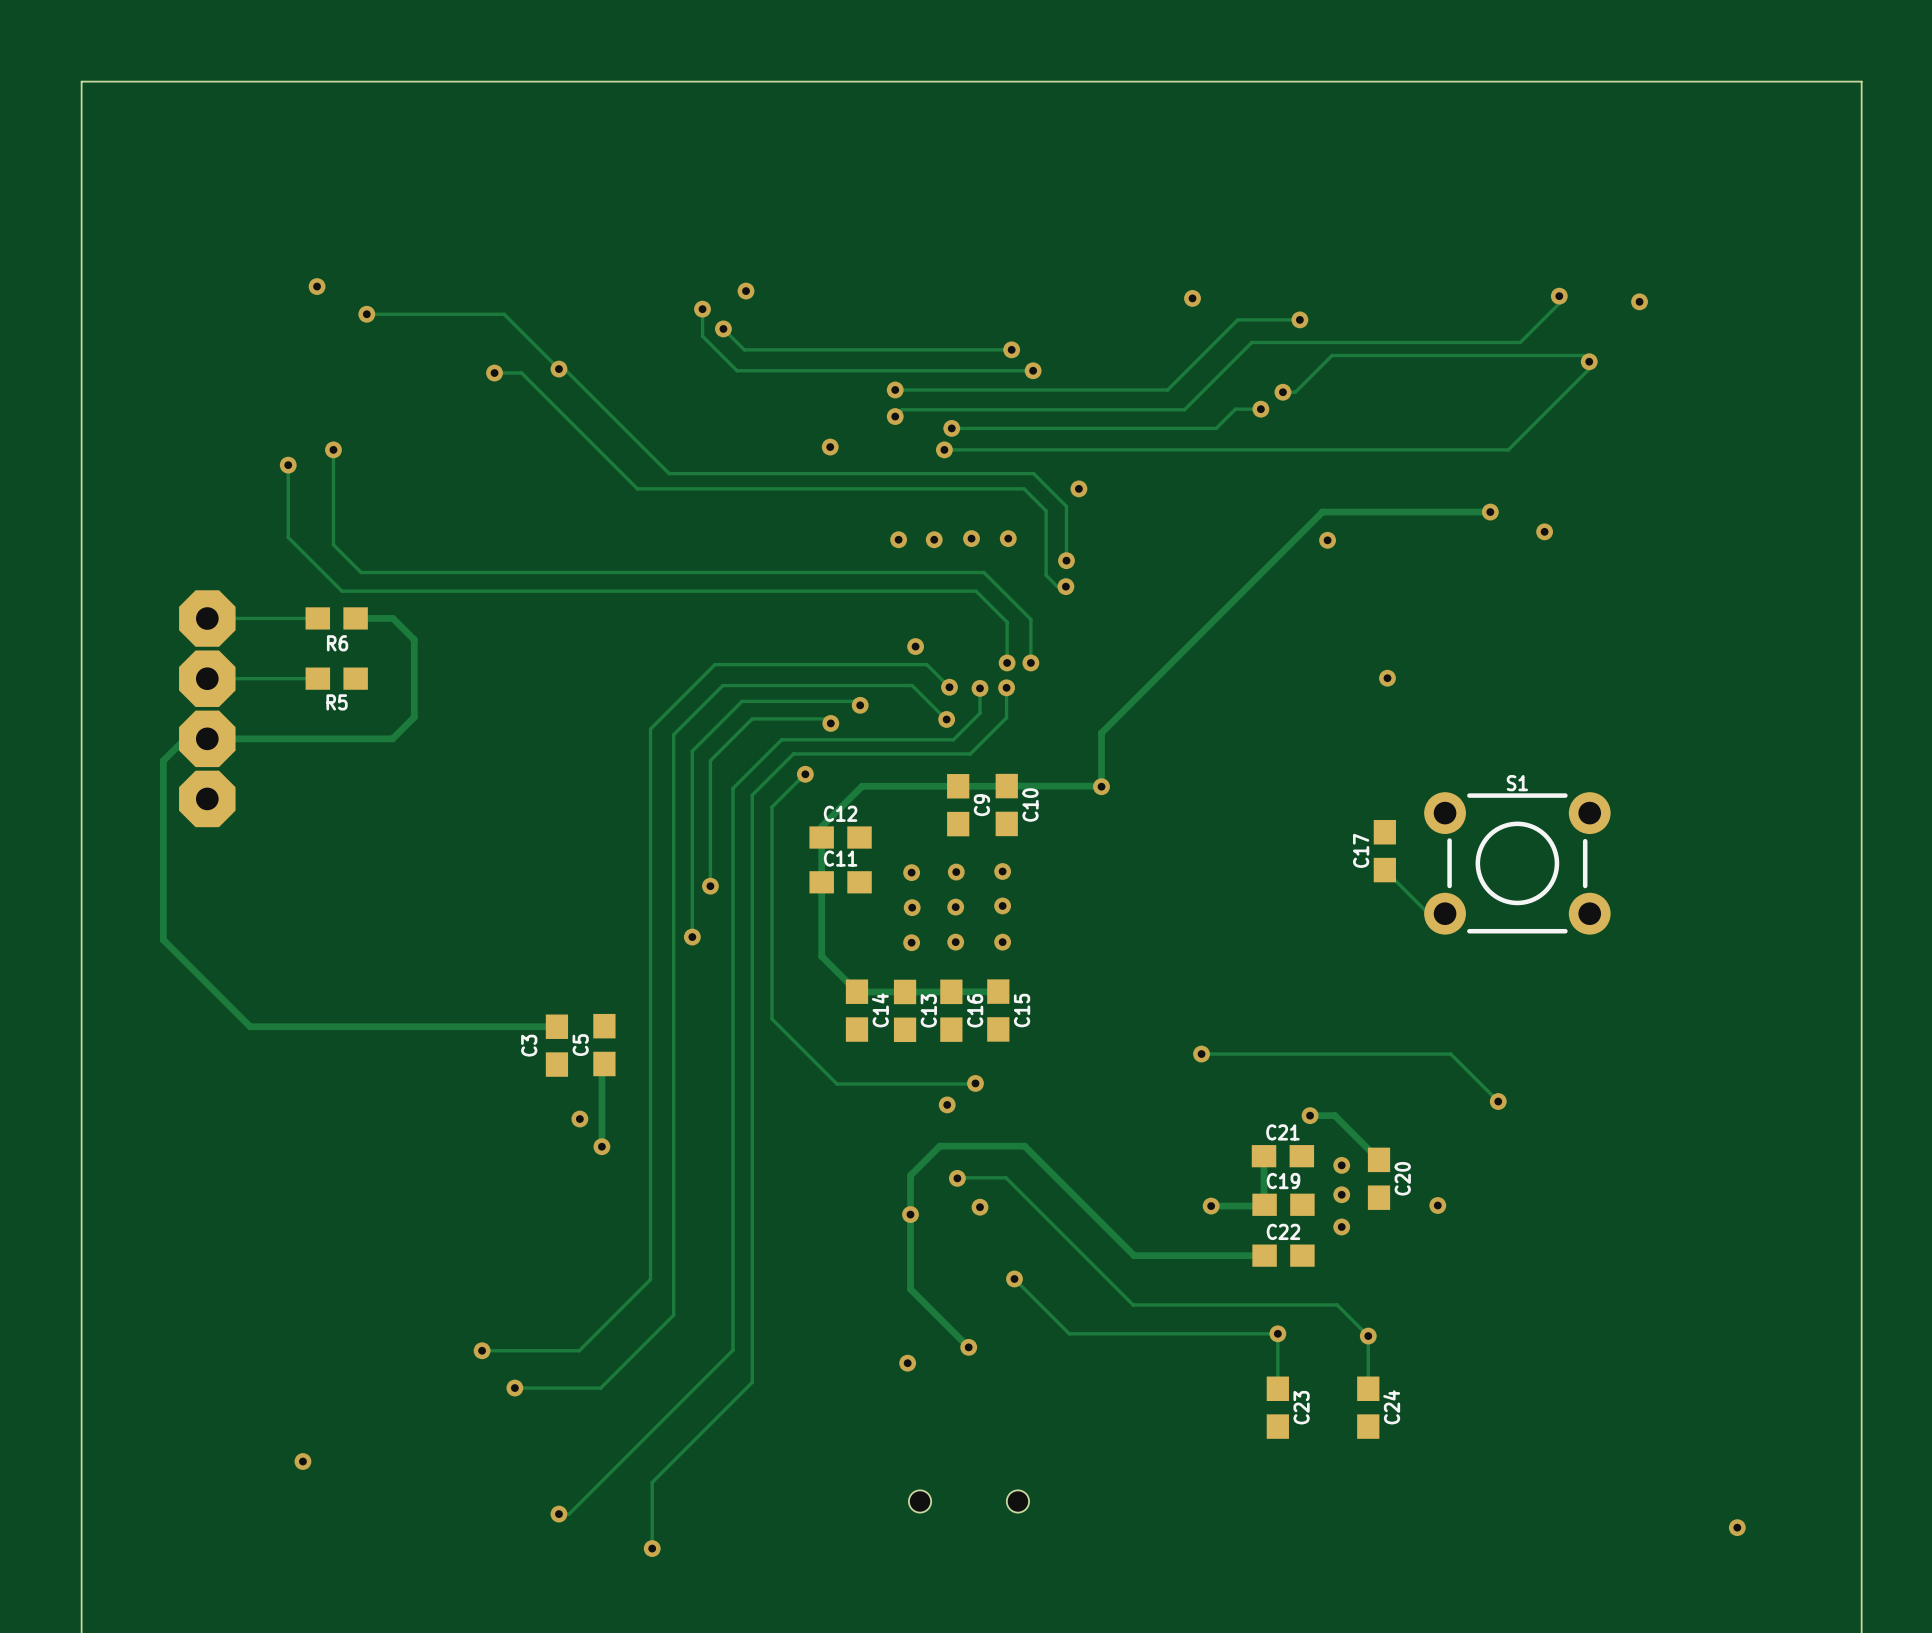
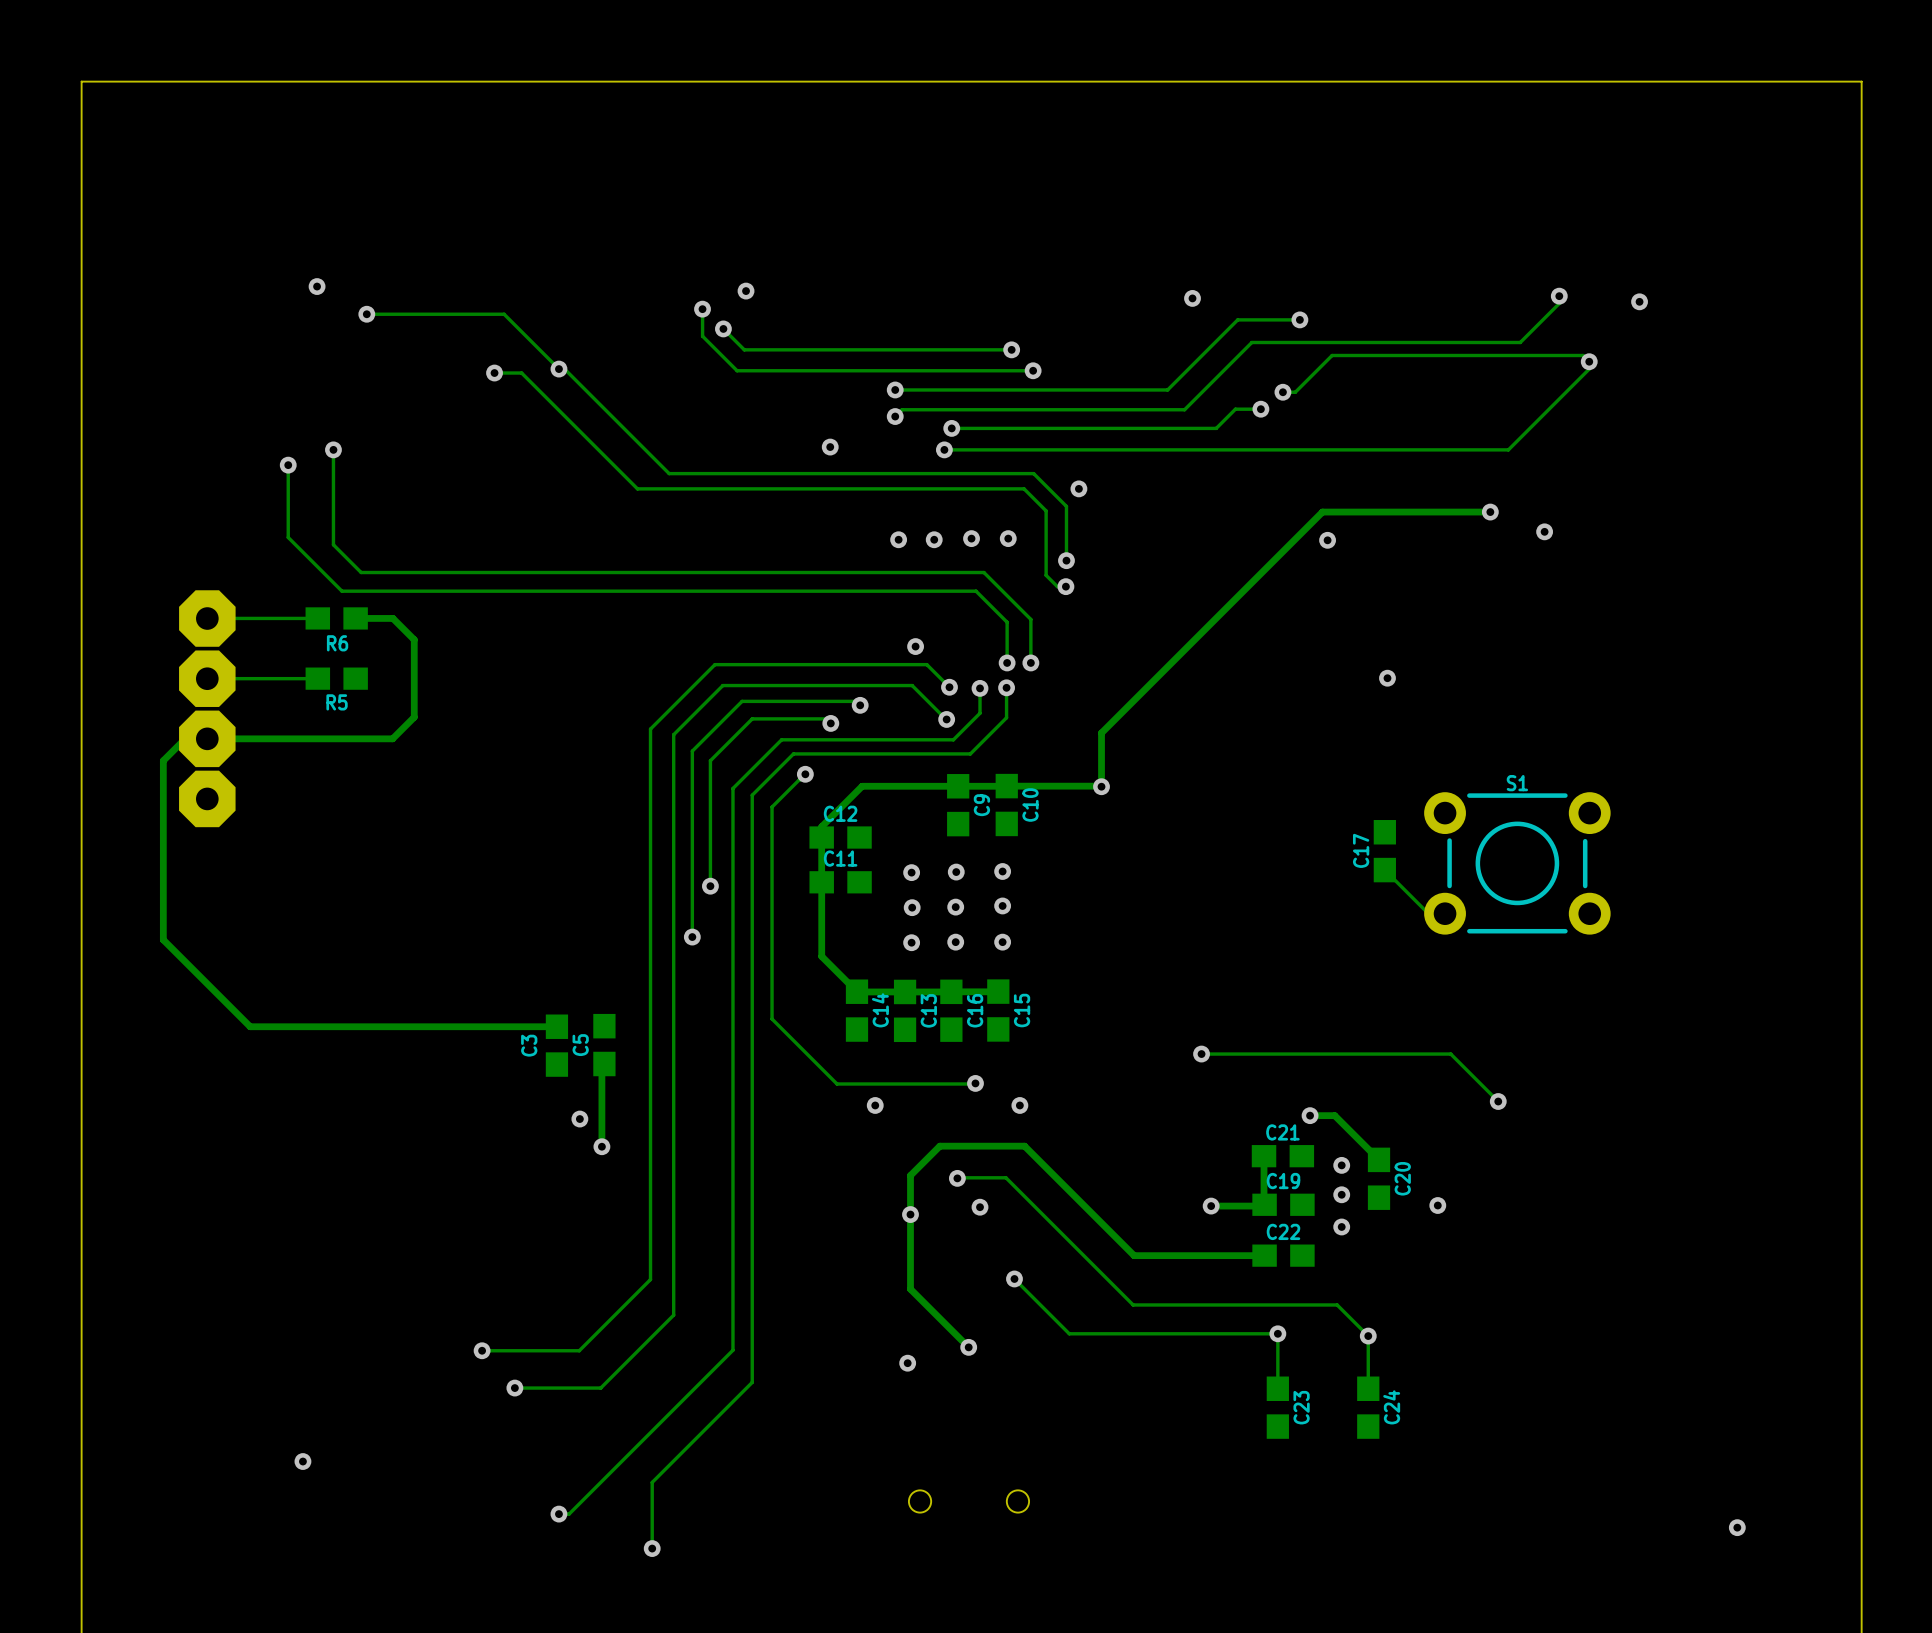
via: (947, 1104) -> none
via: none -> (875, 1105)
via: none -> (1019, 1105)

